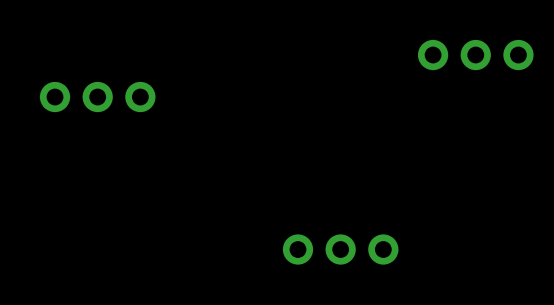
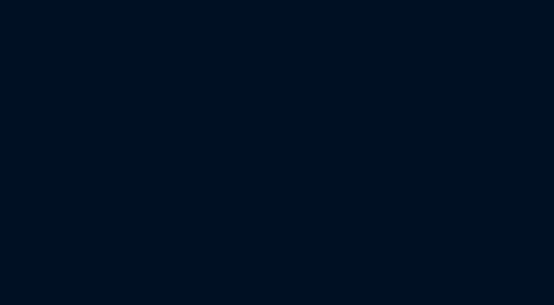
part: (475, 55) -> none
part: (97, 97) -> none
part: (340, 249) -> none

